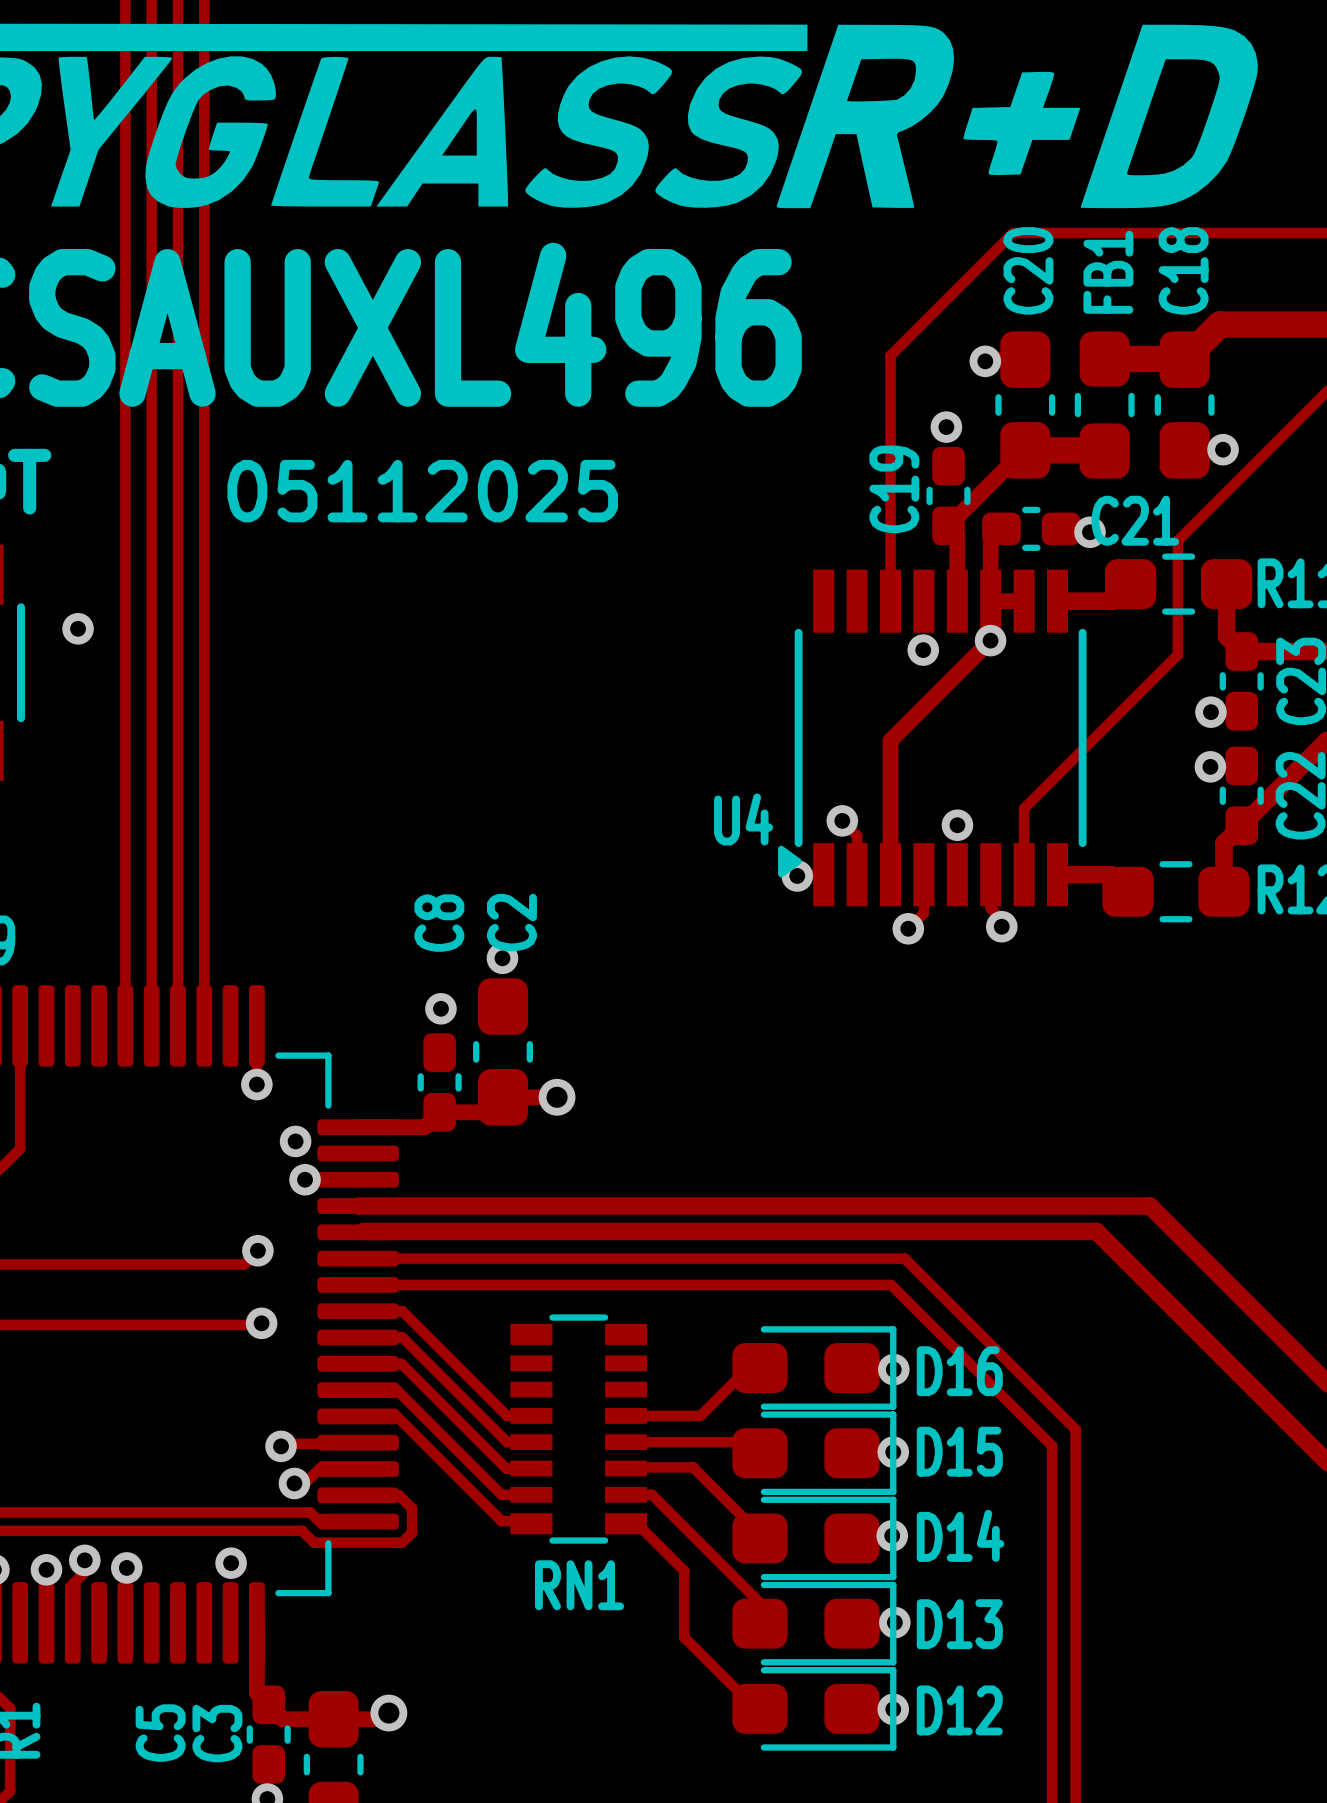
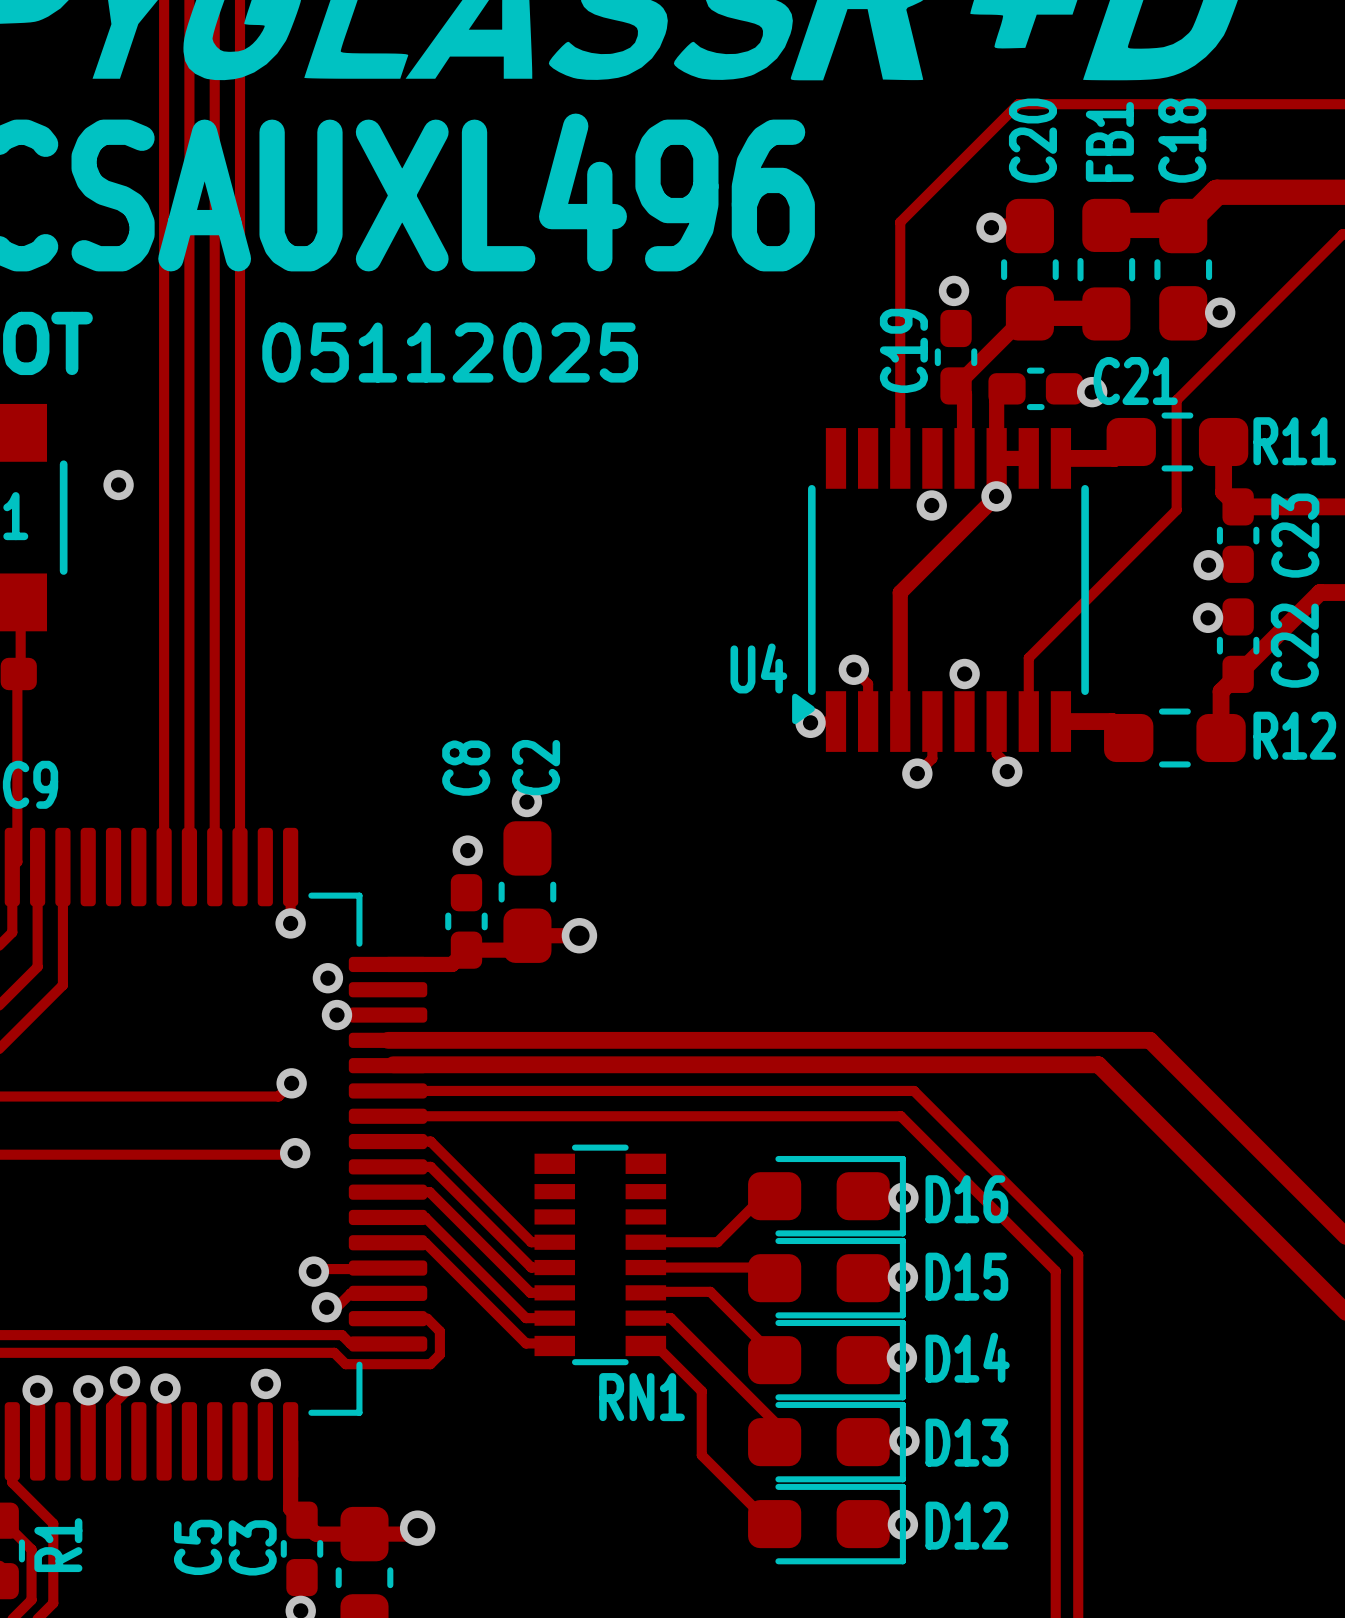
RN1 name position: RN1 (579, 1585) -> RN1 (642, 1397)

